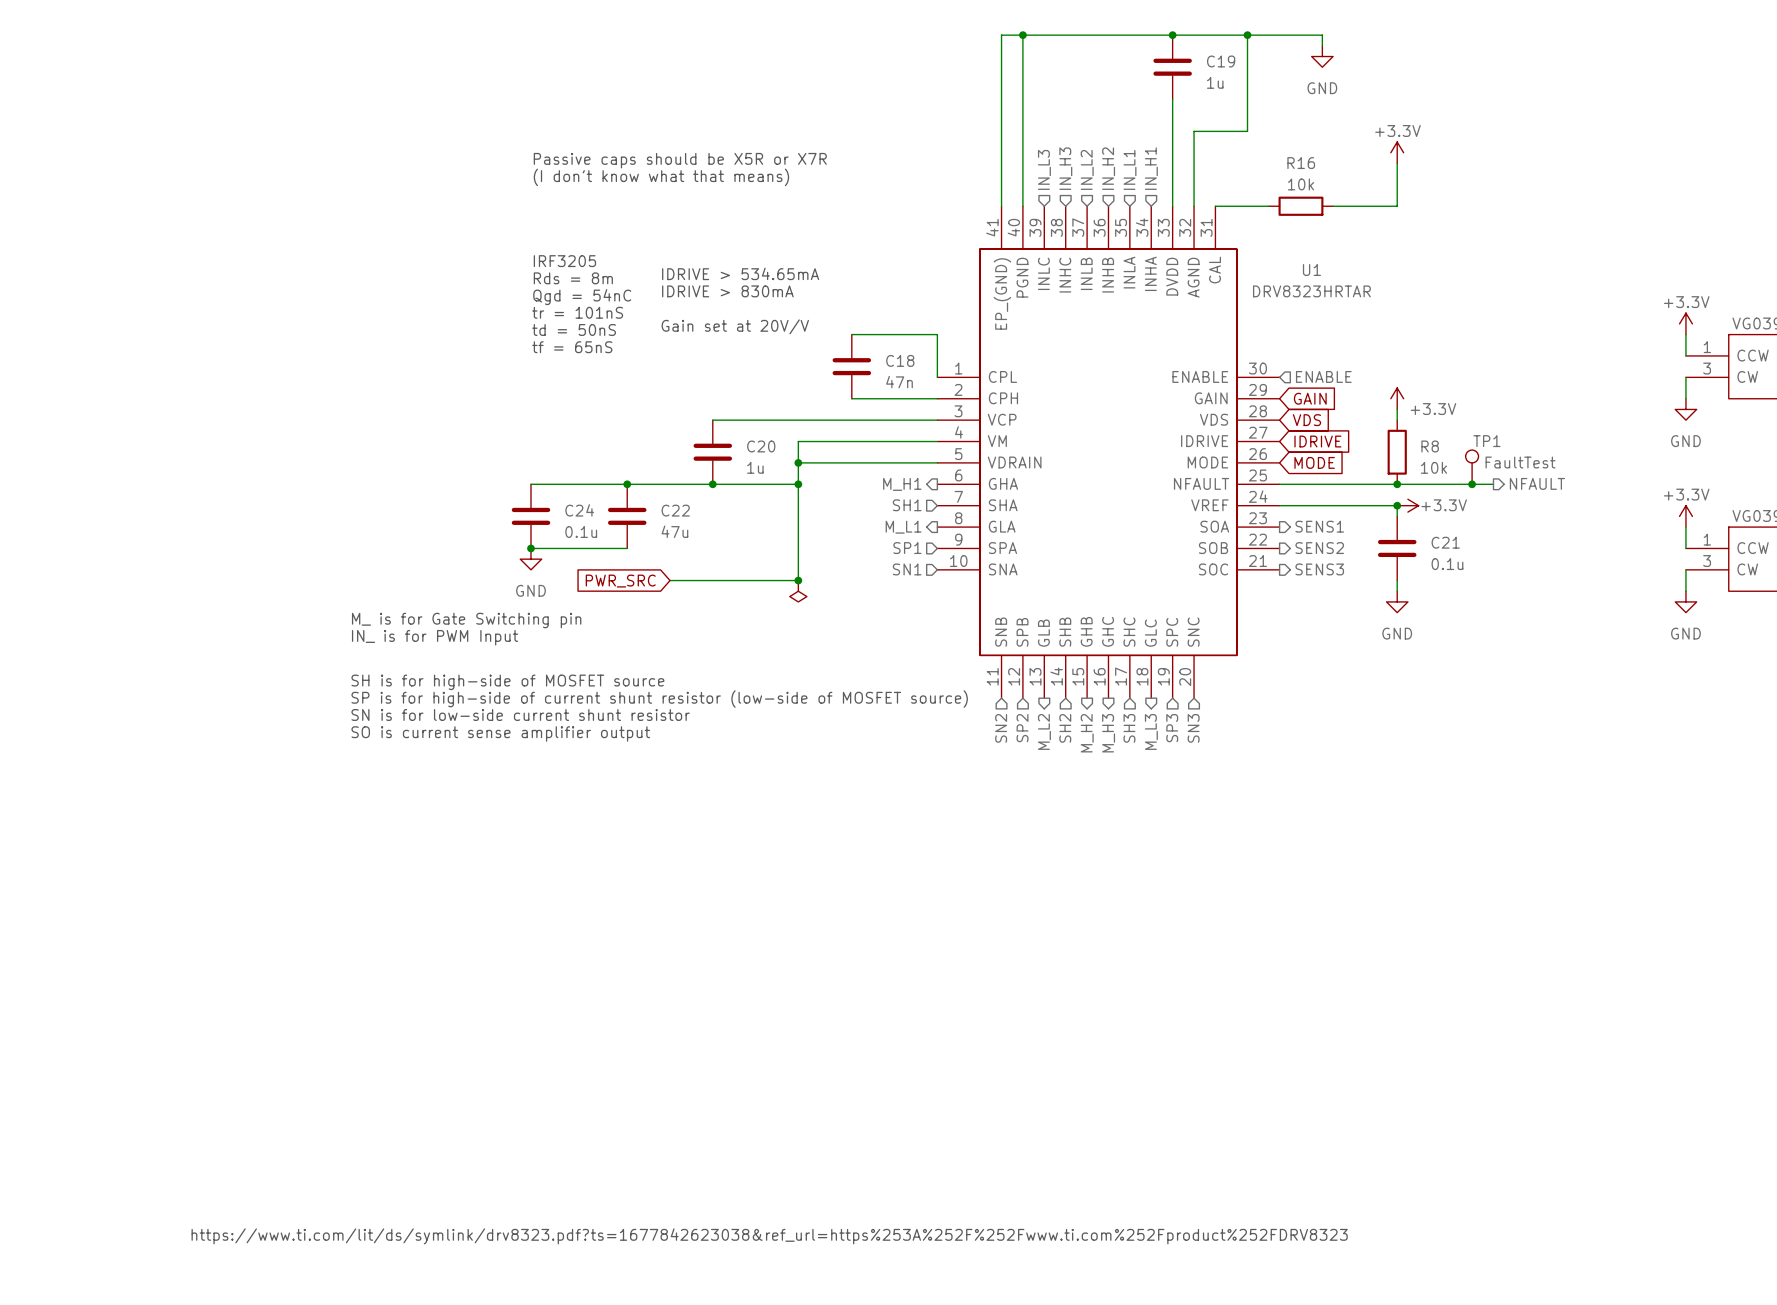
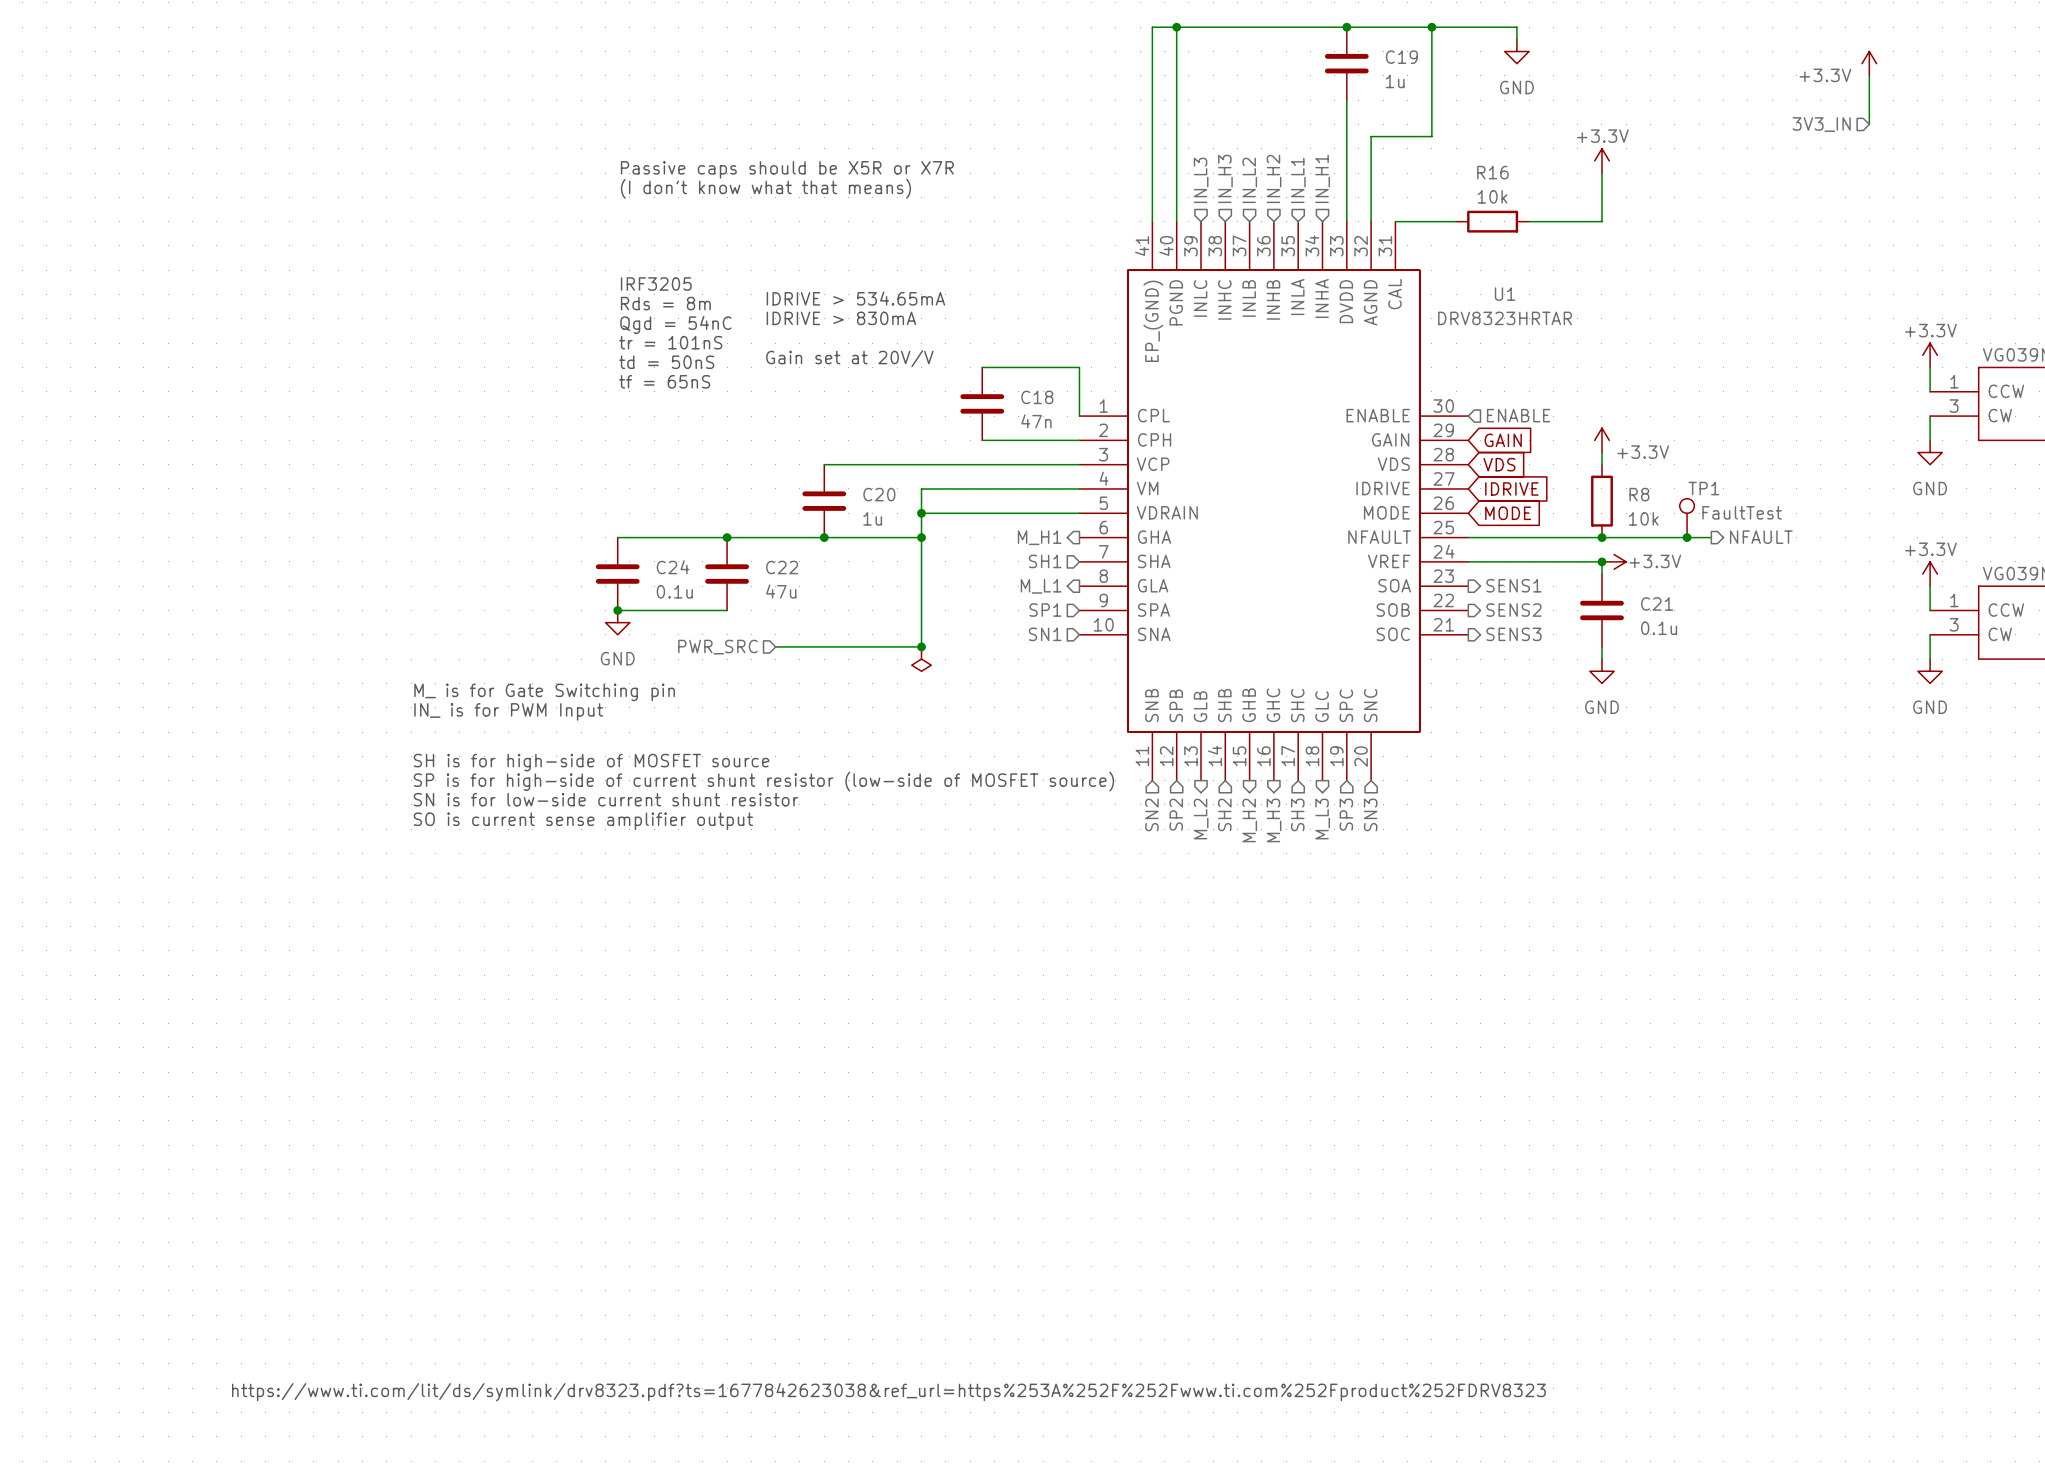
power symbol: none -> +3.3V (1869, 63)
wire: none -> (1869, 75) (1869, 124)
hierarchical label: none -> 3V3_IN (1821, 124)
hierarchical label: none -> PWR_SRC (717, 647)
global label: PWR_SRC (620, 581) -> none

